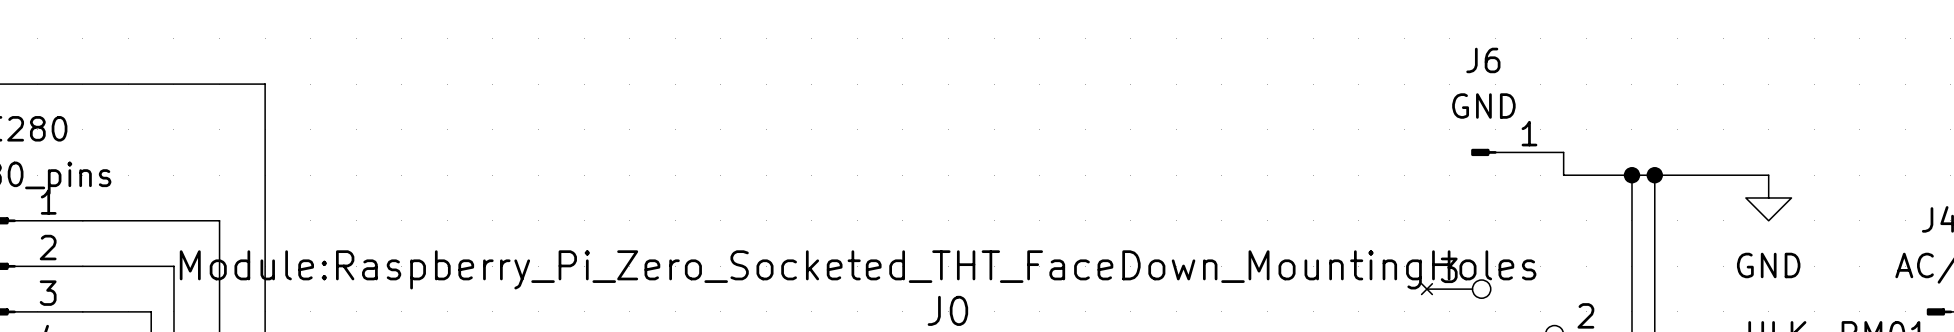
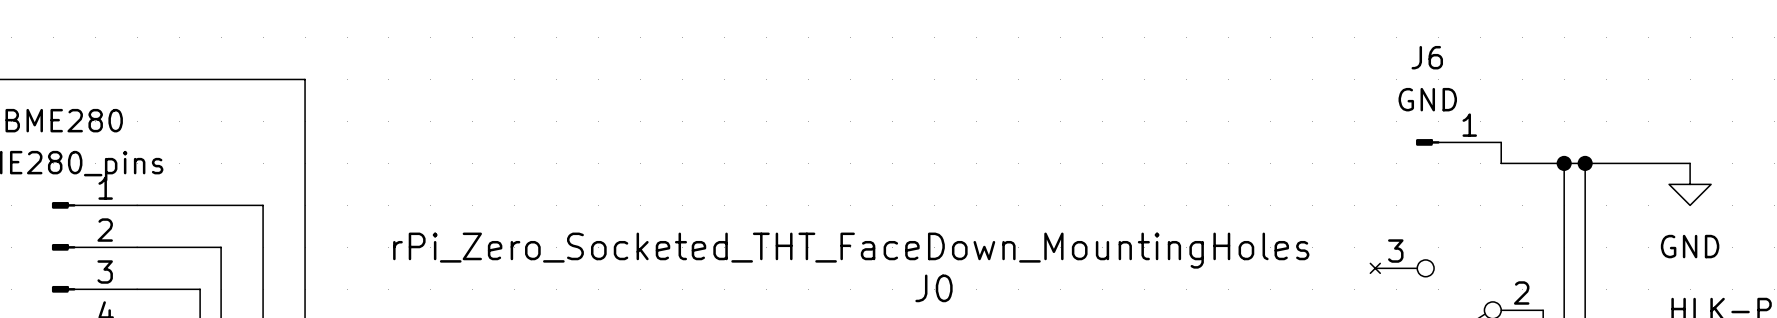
J0 text: Module:Raspberry_Pi_Zero_Socketed_THT_FaceDown_MountingHoles (858, 269) -> rPi_Zero_Socketed_THT_FaceDown_MountingHoles (851, 250)

